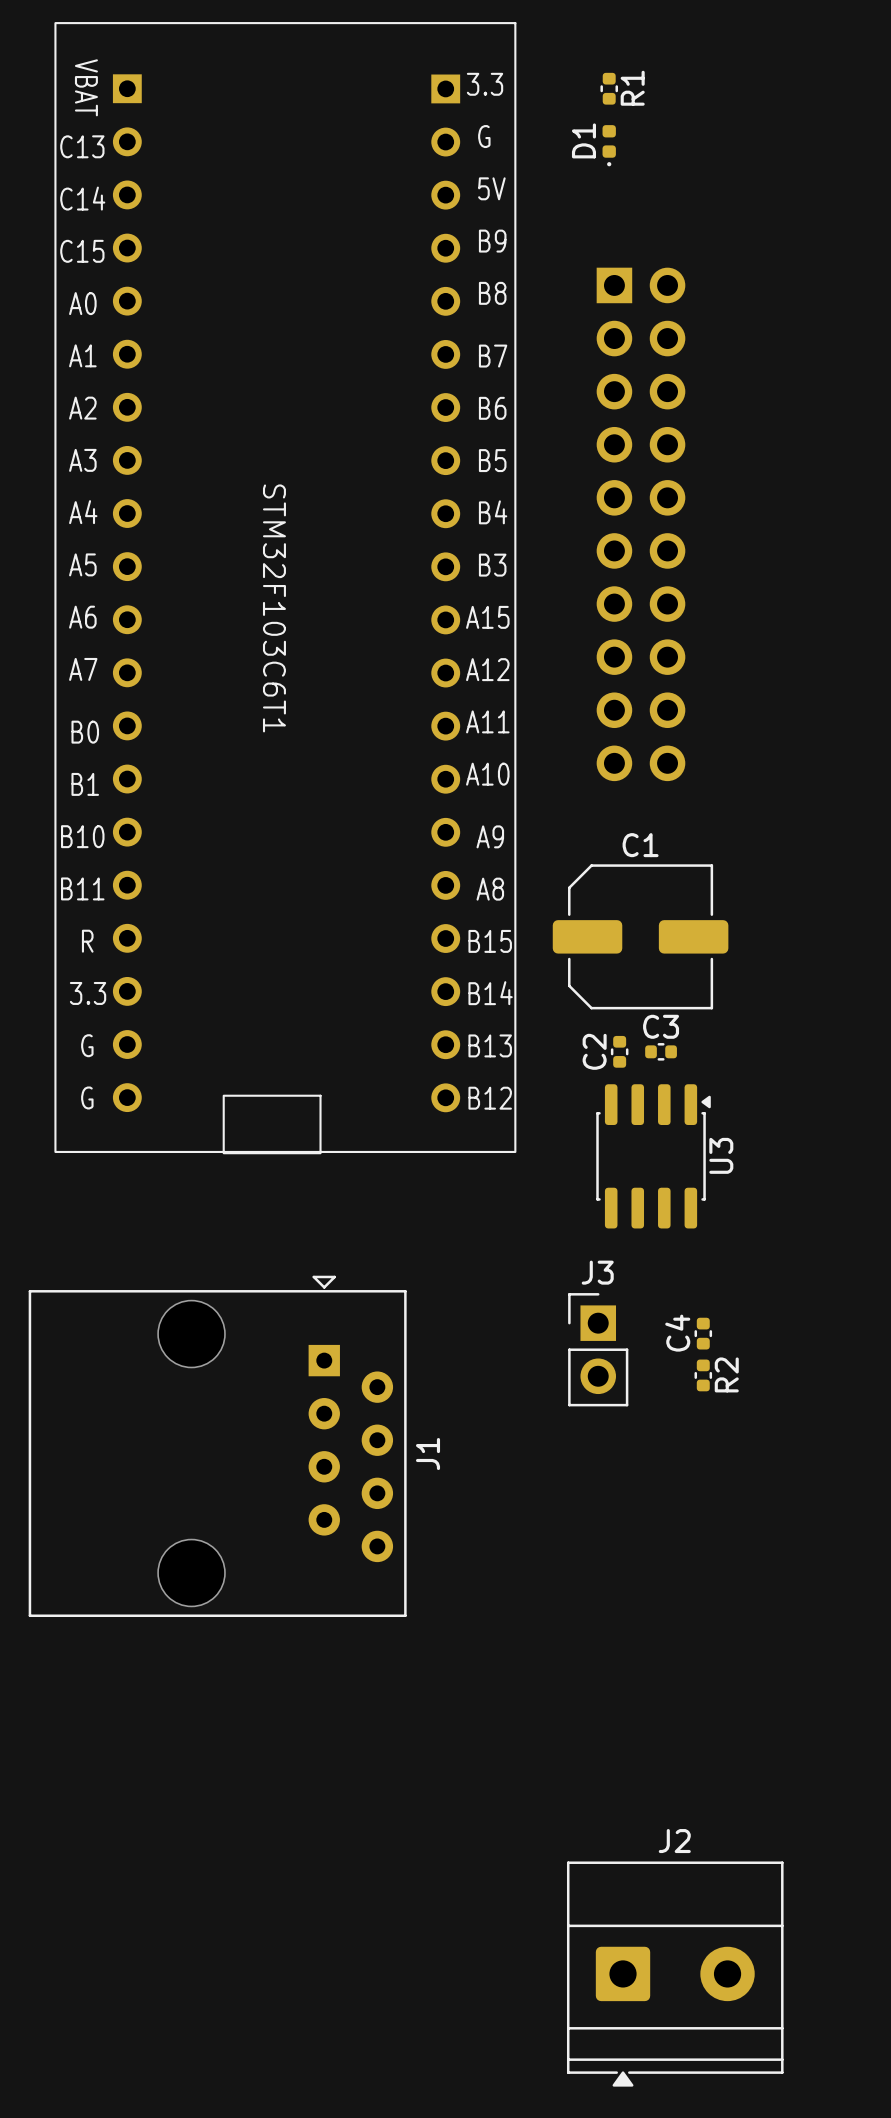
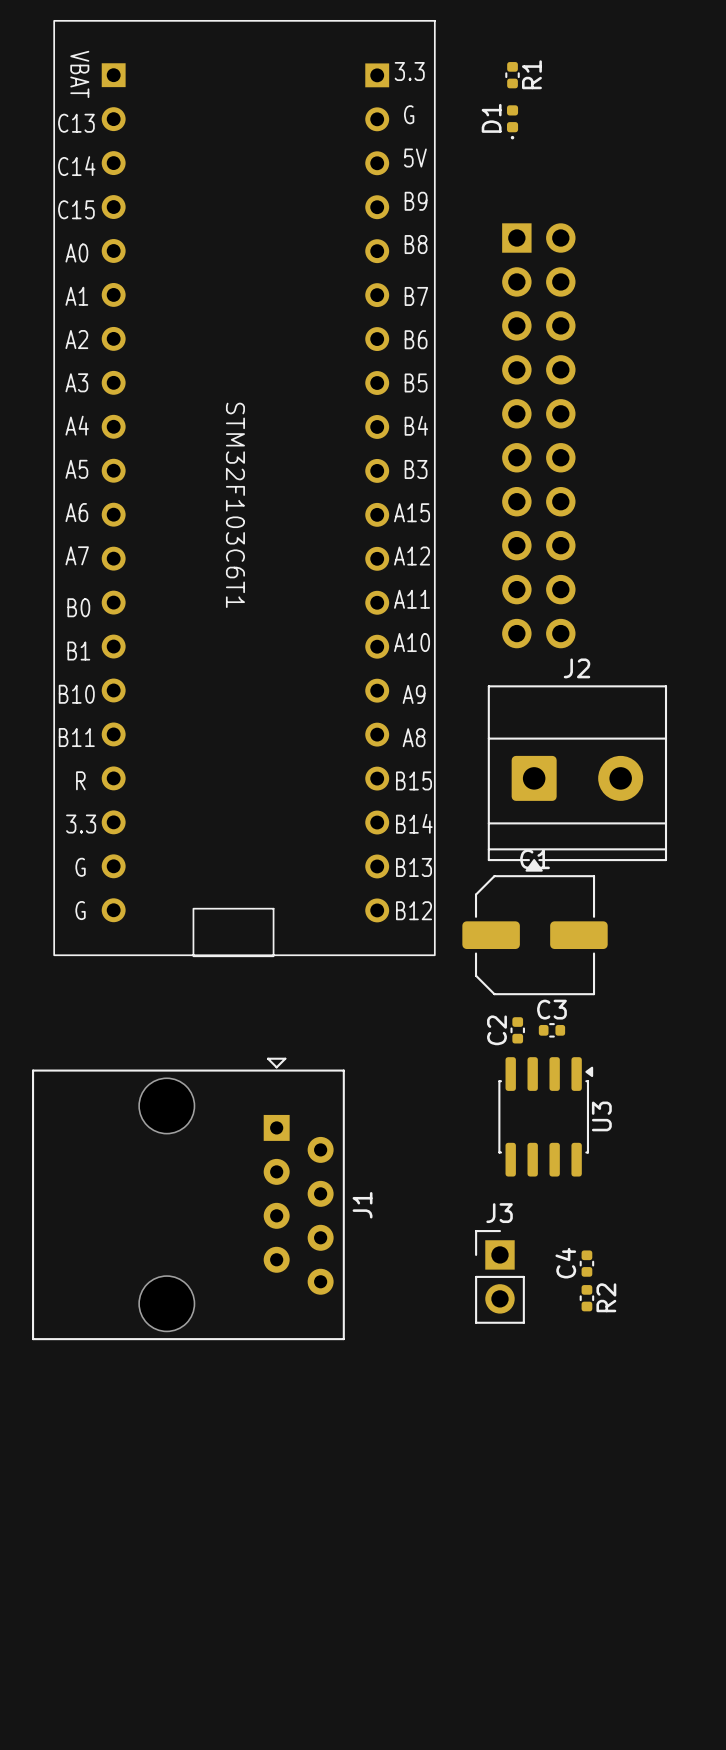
C1 position: (640, 936) -> (535, 935)
C2 position: (619, 1051) -> (517, 1030)
C3 position: (661, 1051) -> (551, 1030)
U3 position: (653, 1156) -> (545, 1116)
C4 position: (703, 1333) -> (586, 1263)
J3 position: (598, 1349) -> (499, 1276)
R2 position: (703, 1375) -> (586, 1298)
J2 position: (675, 1974) -> (577, 778)

